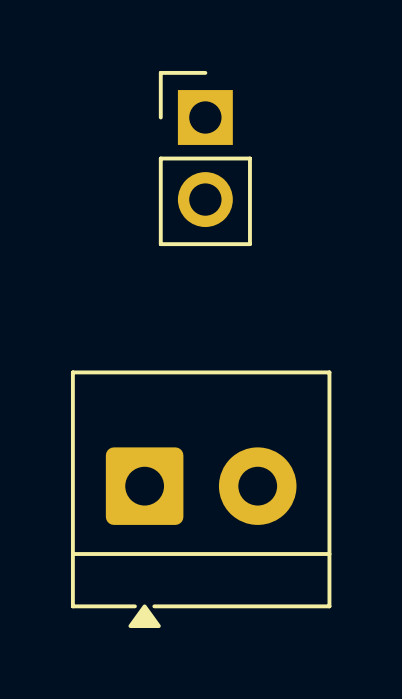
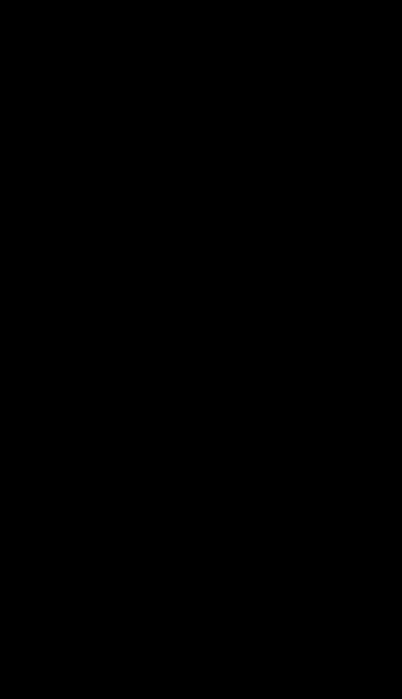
part: (205, 158) -> none
part: (201, 499) -> none

